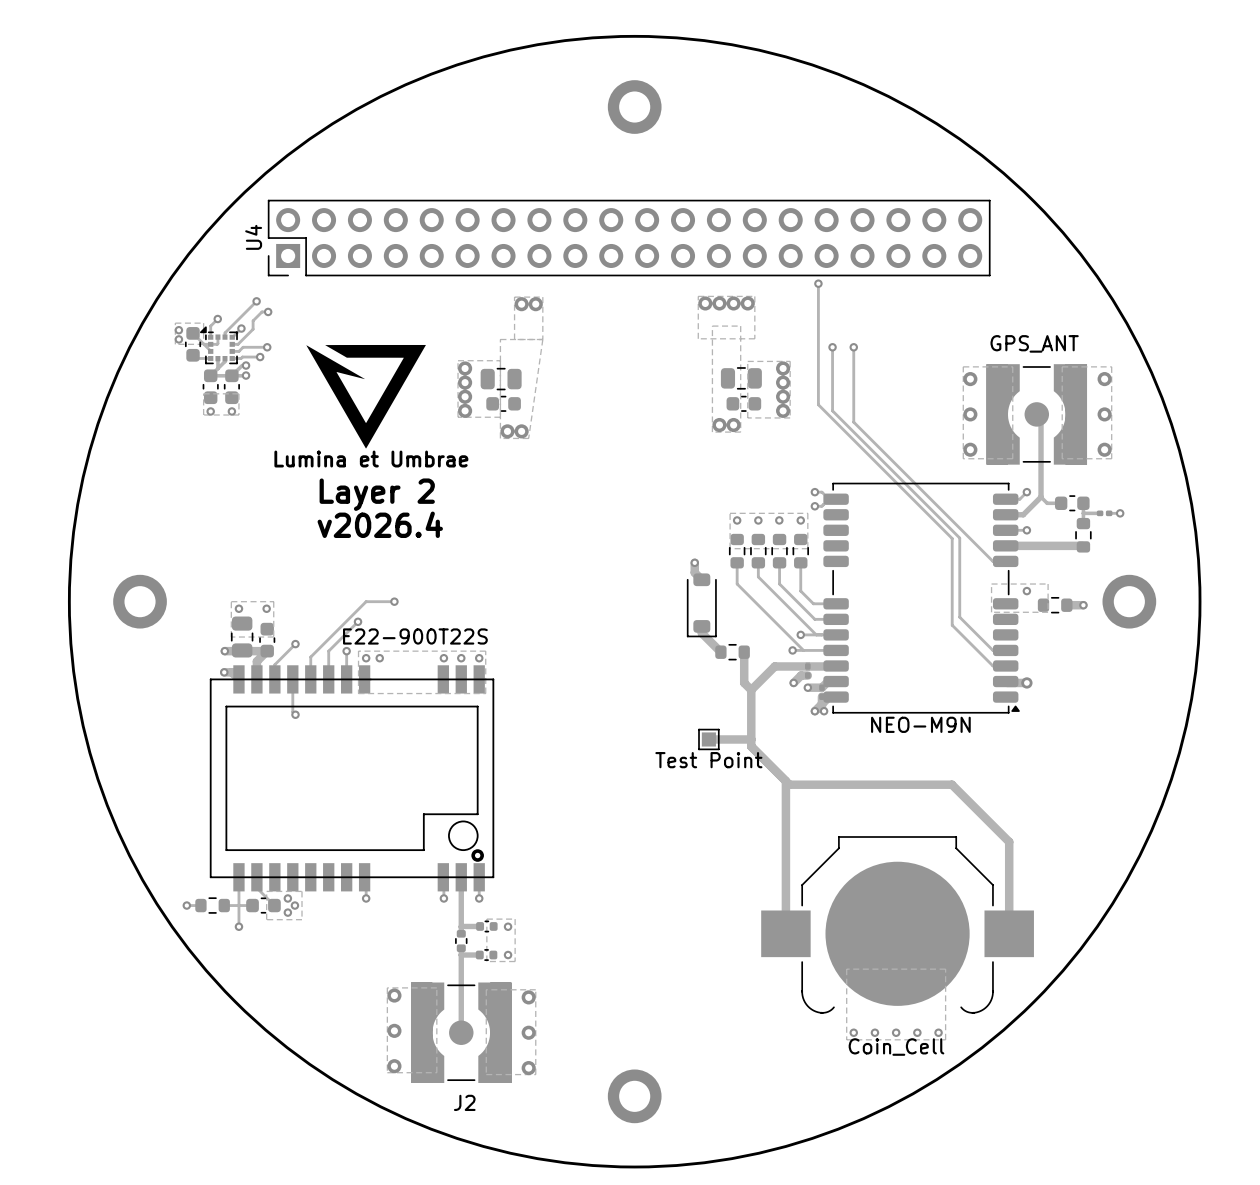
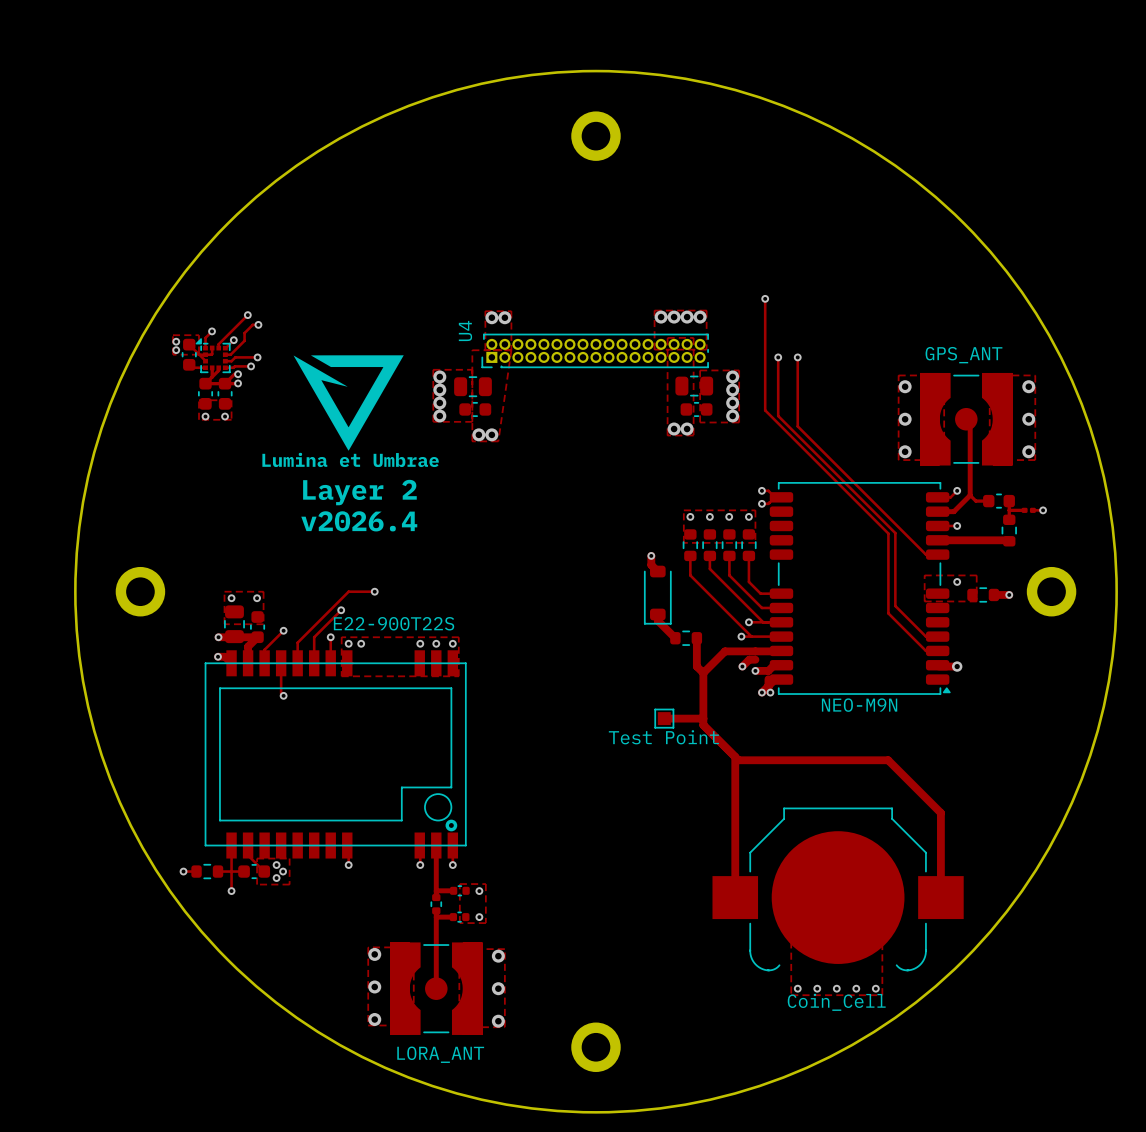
U4 footprint: [267, 199, 991, 277] -> [481, 333, 709, 369]
U4 name position: U4 (253, 237) -> U4 (465, 331)
J2 name: J2 (464, 1102) -> LORA_ANT (440, 1054)

